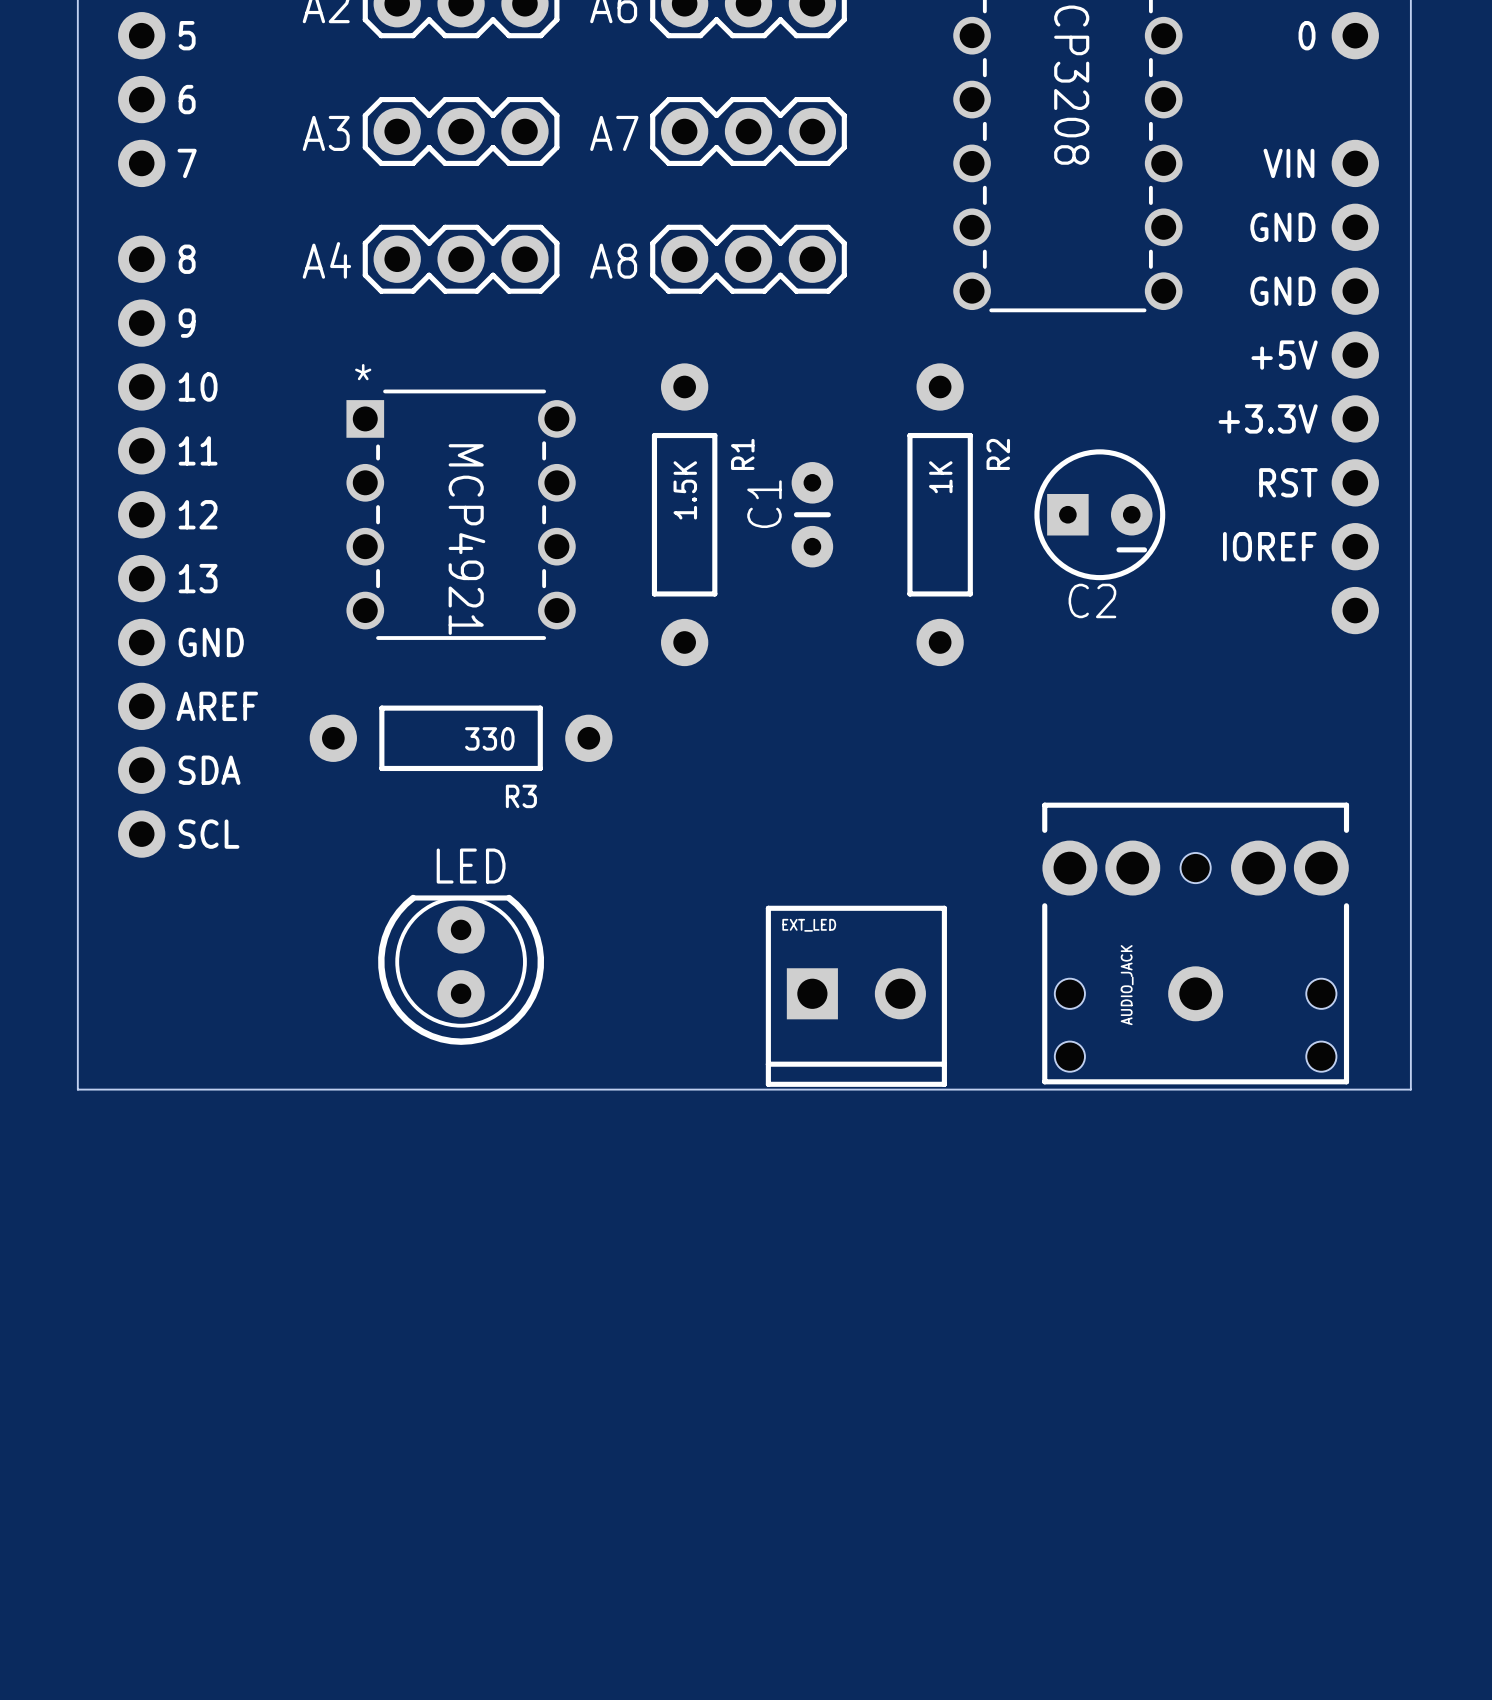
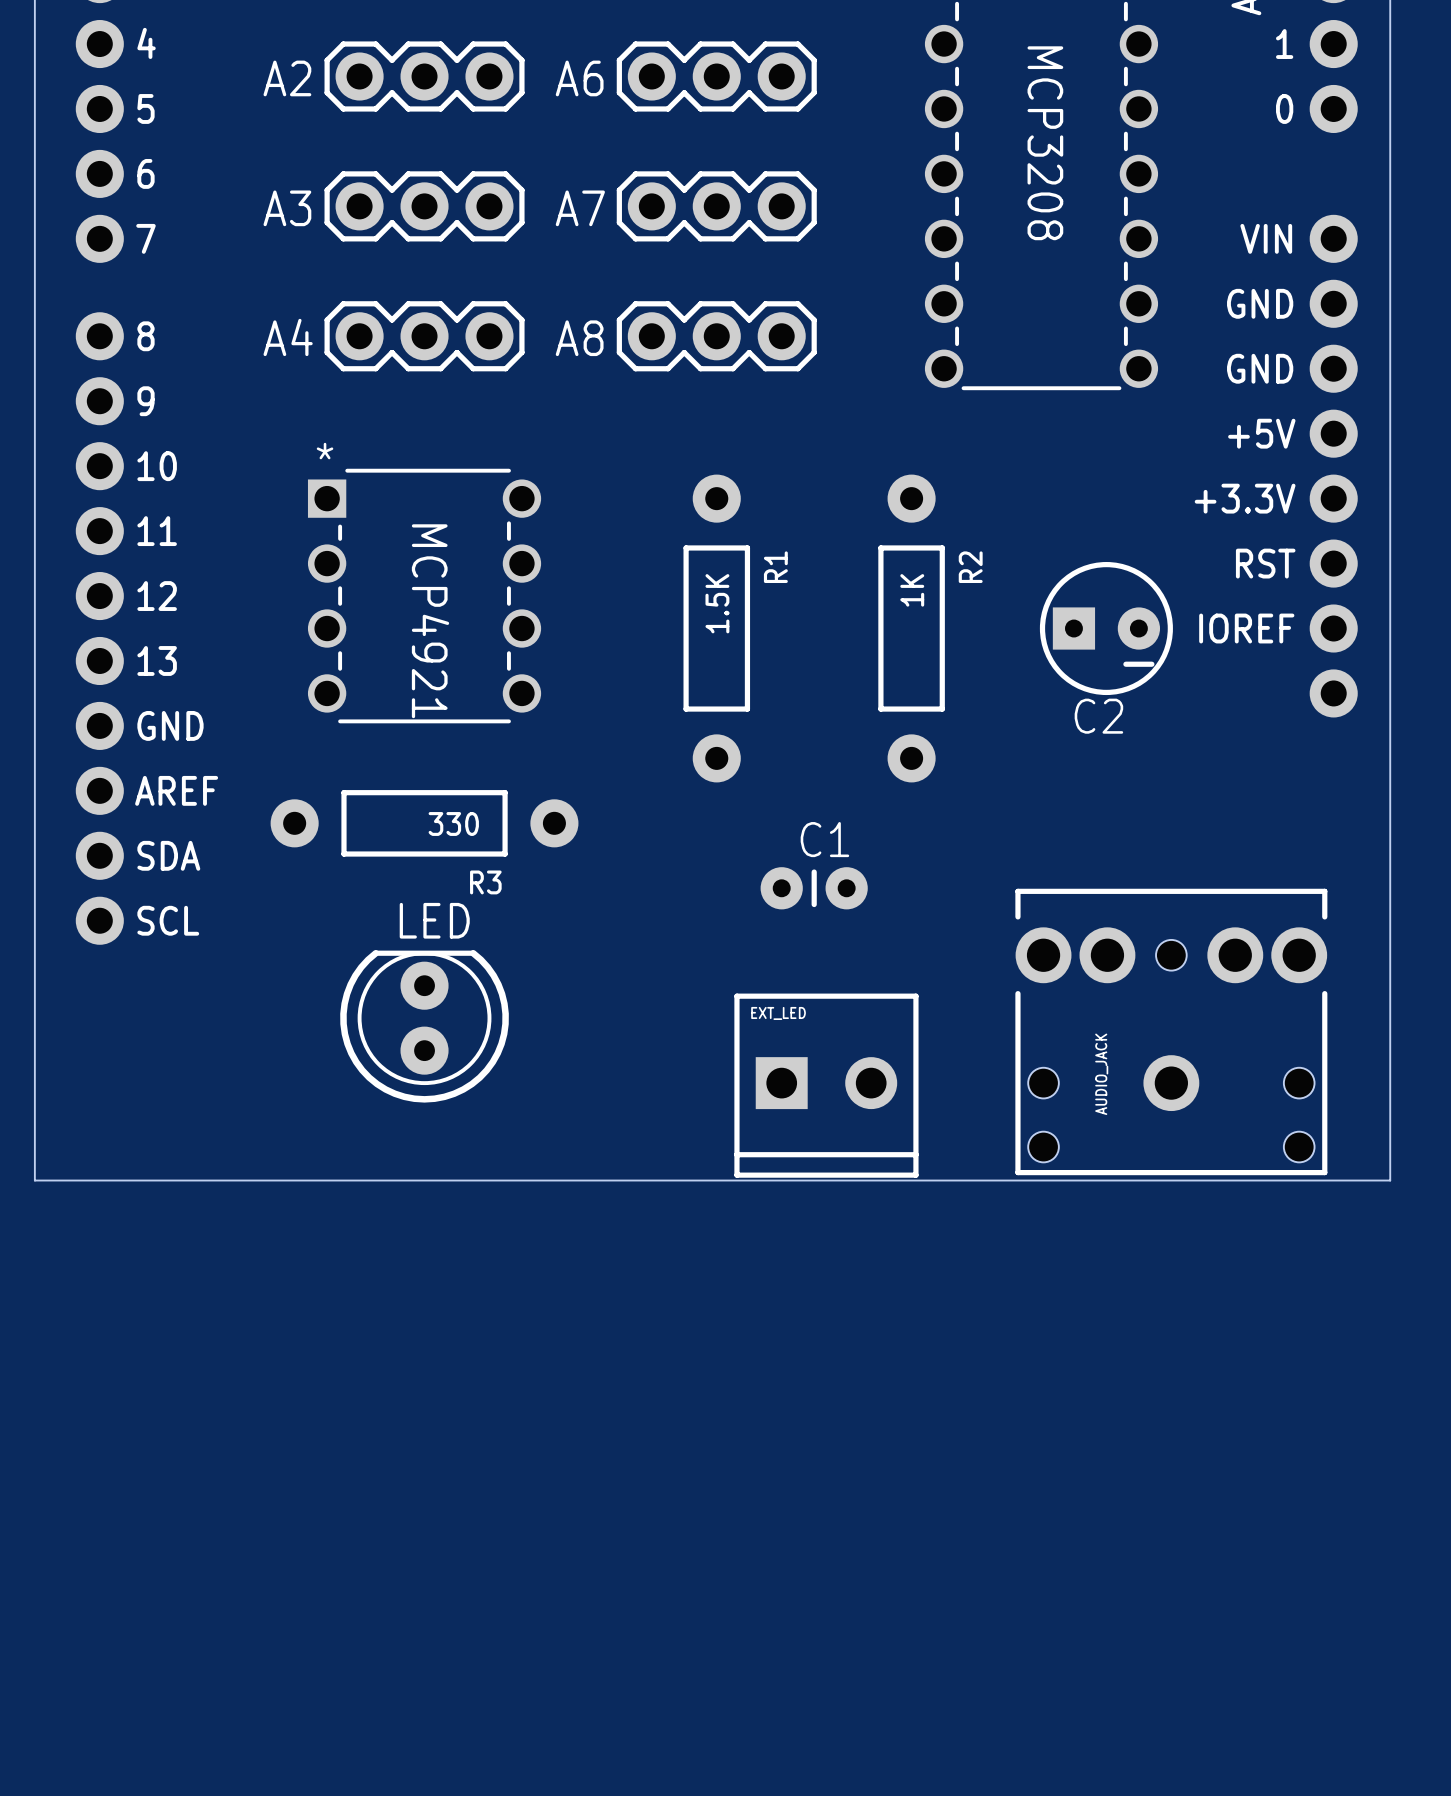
R1 position: (684, 514) -> (716, 628)
C1 rotation: 0° (812, 514) -> 90° clockwise (814, 888)
C1 position: (812, 514) -> (814, 888)
R2 position: (940, 514) -> (911, 628)
C2 position: (1099, 514) -> (1106, 628)
LED position: (461, 969) -> (424, 1026)

